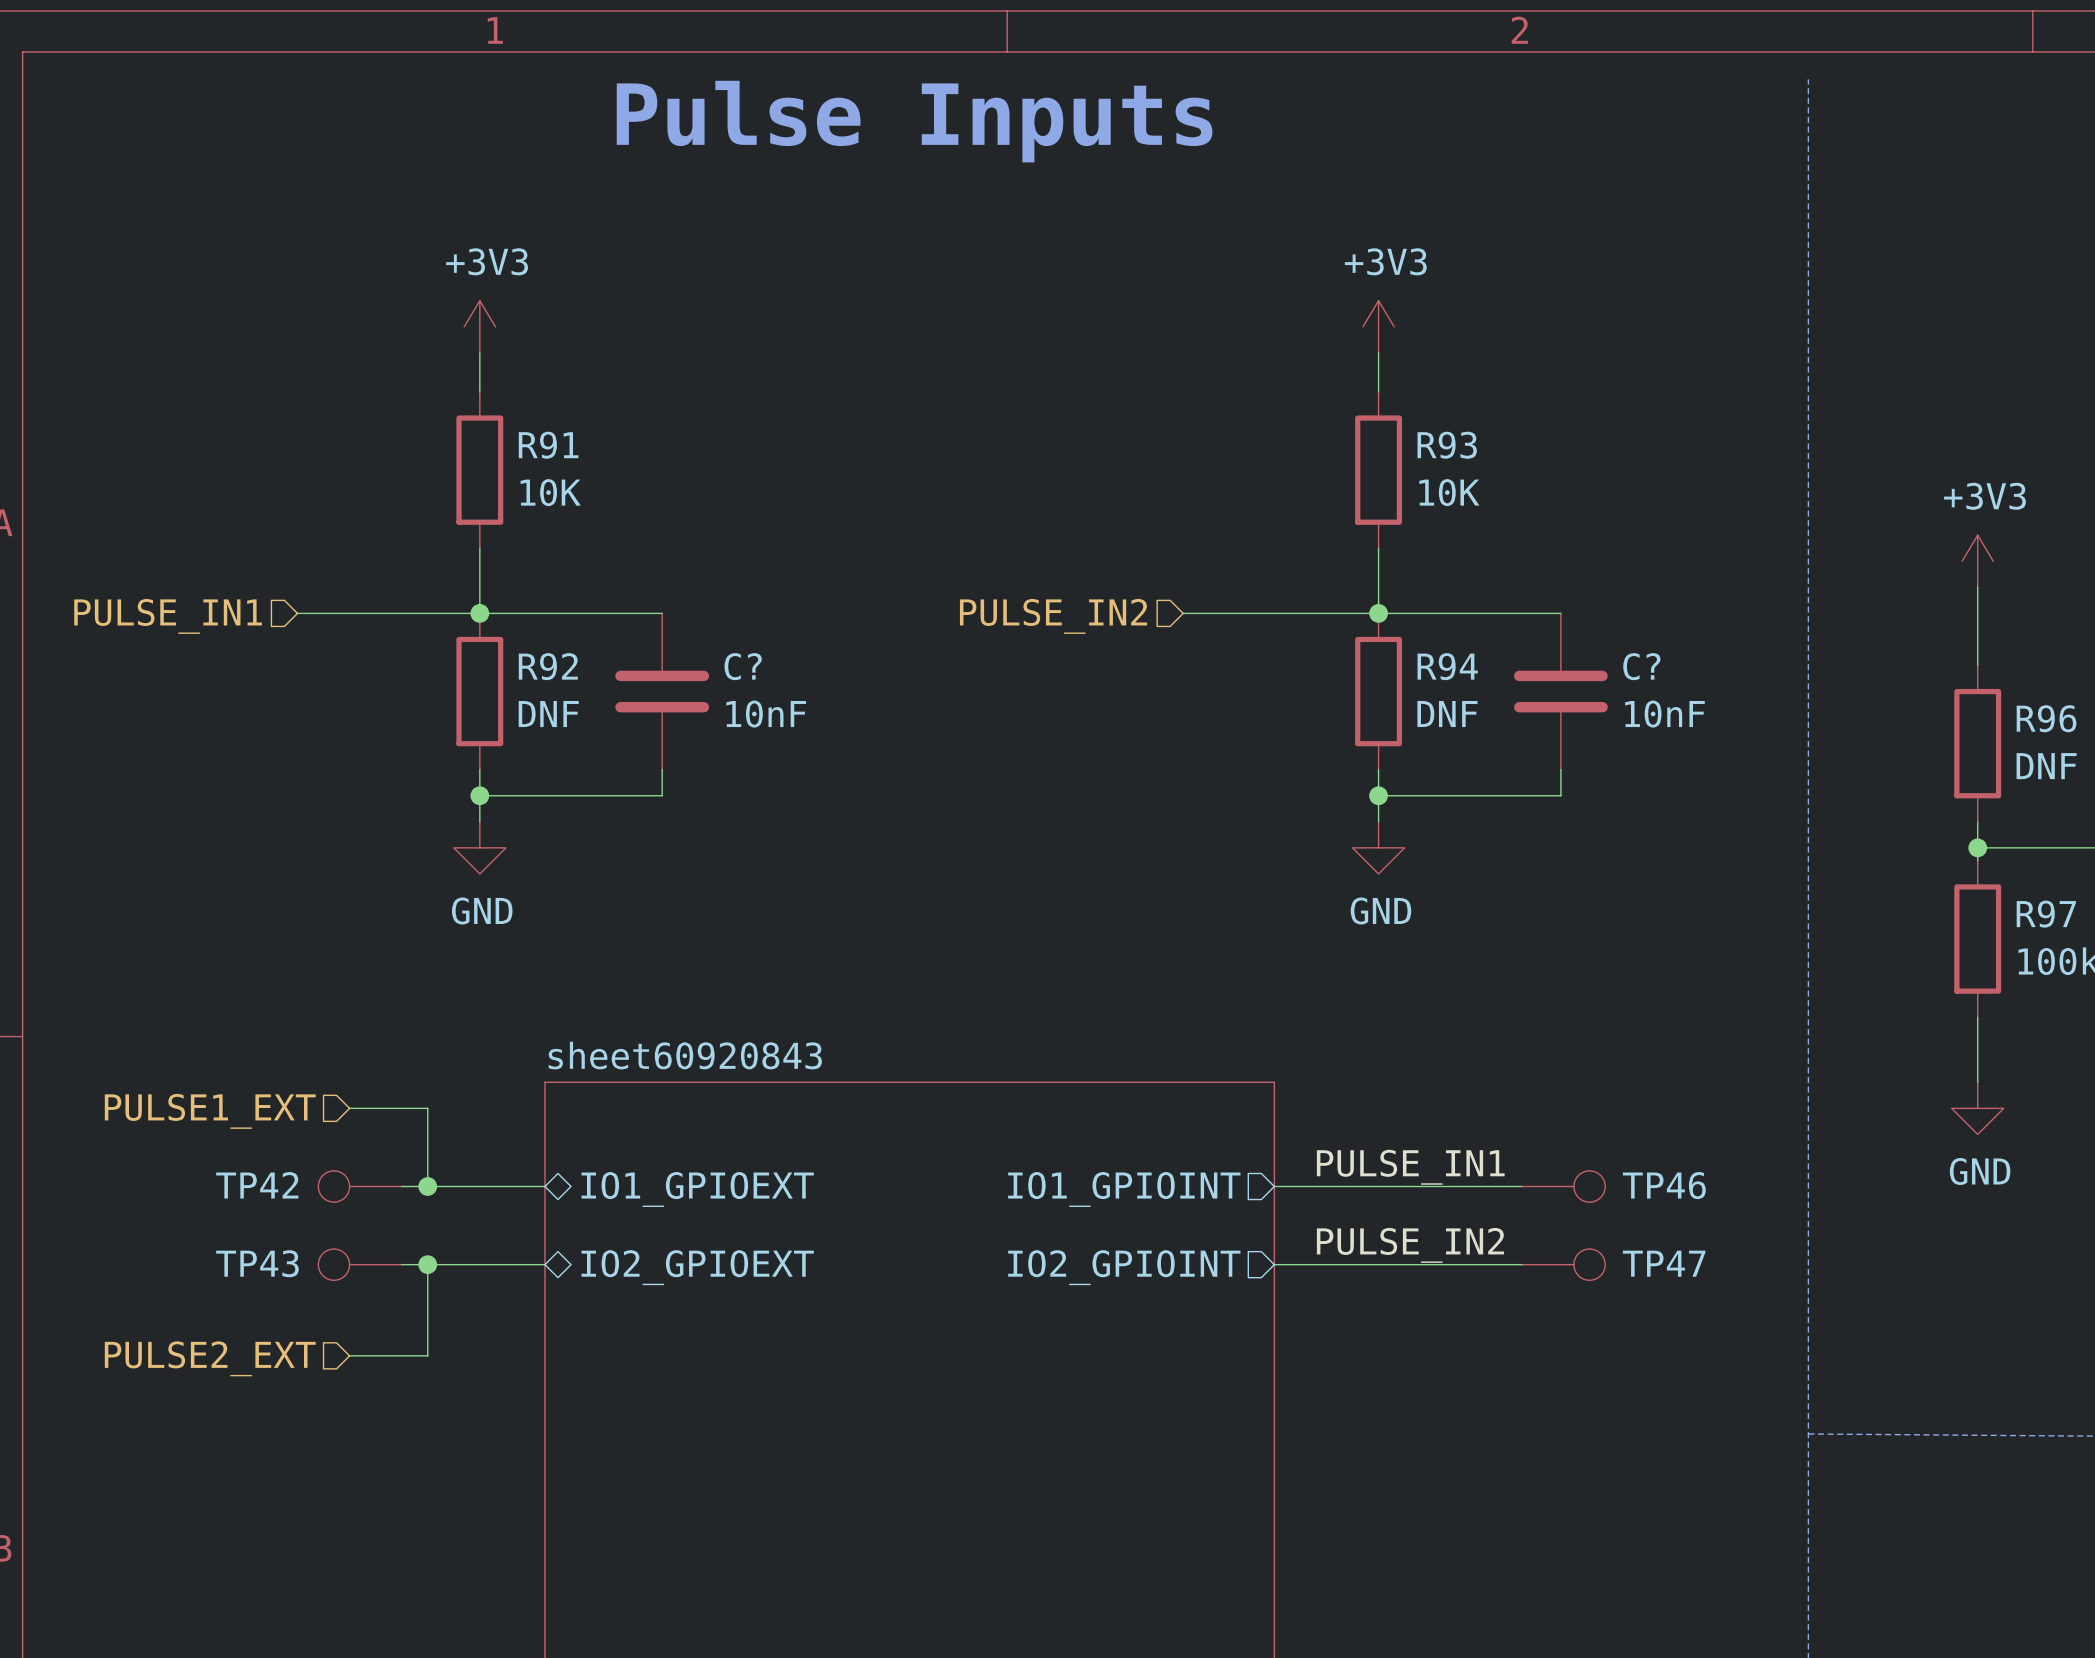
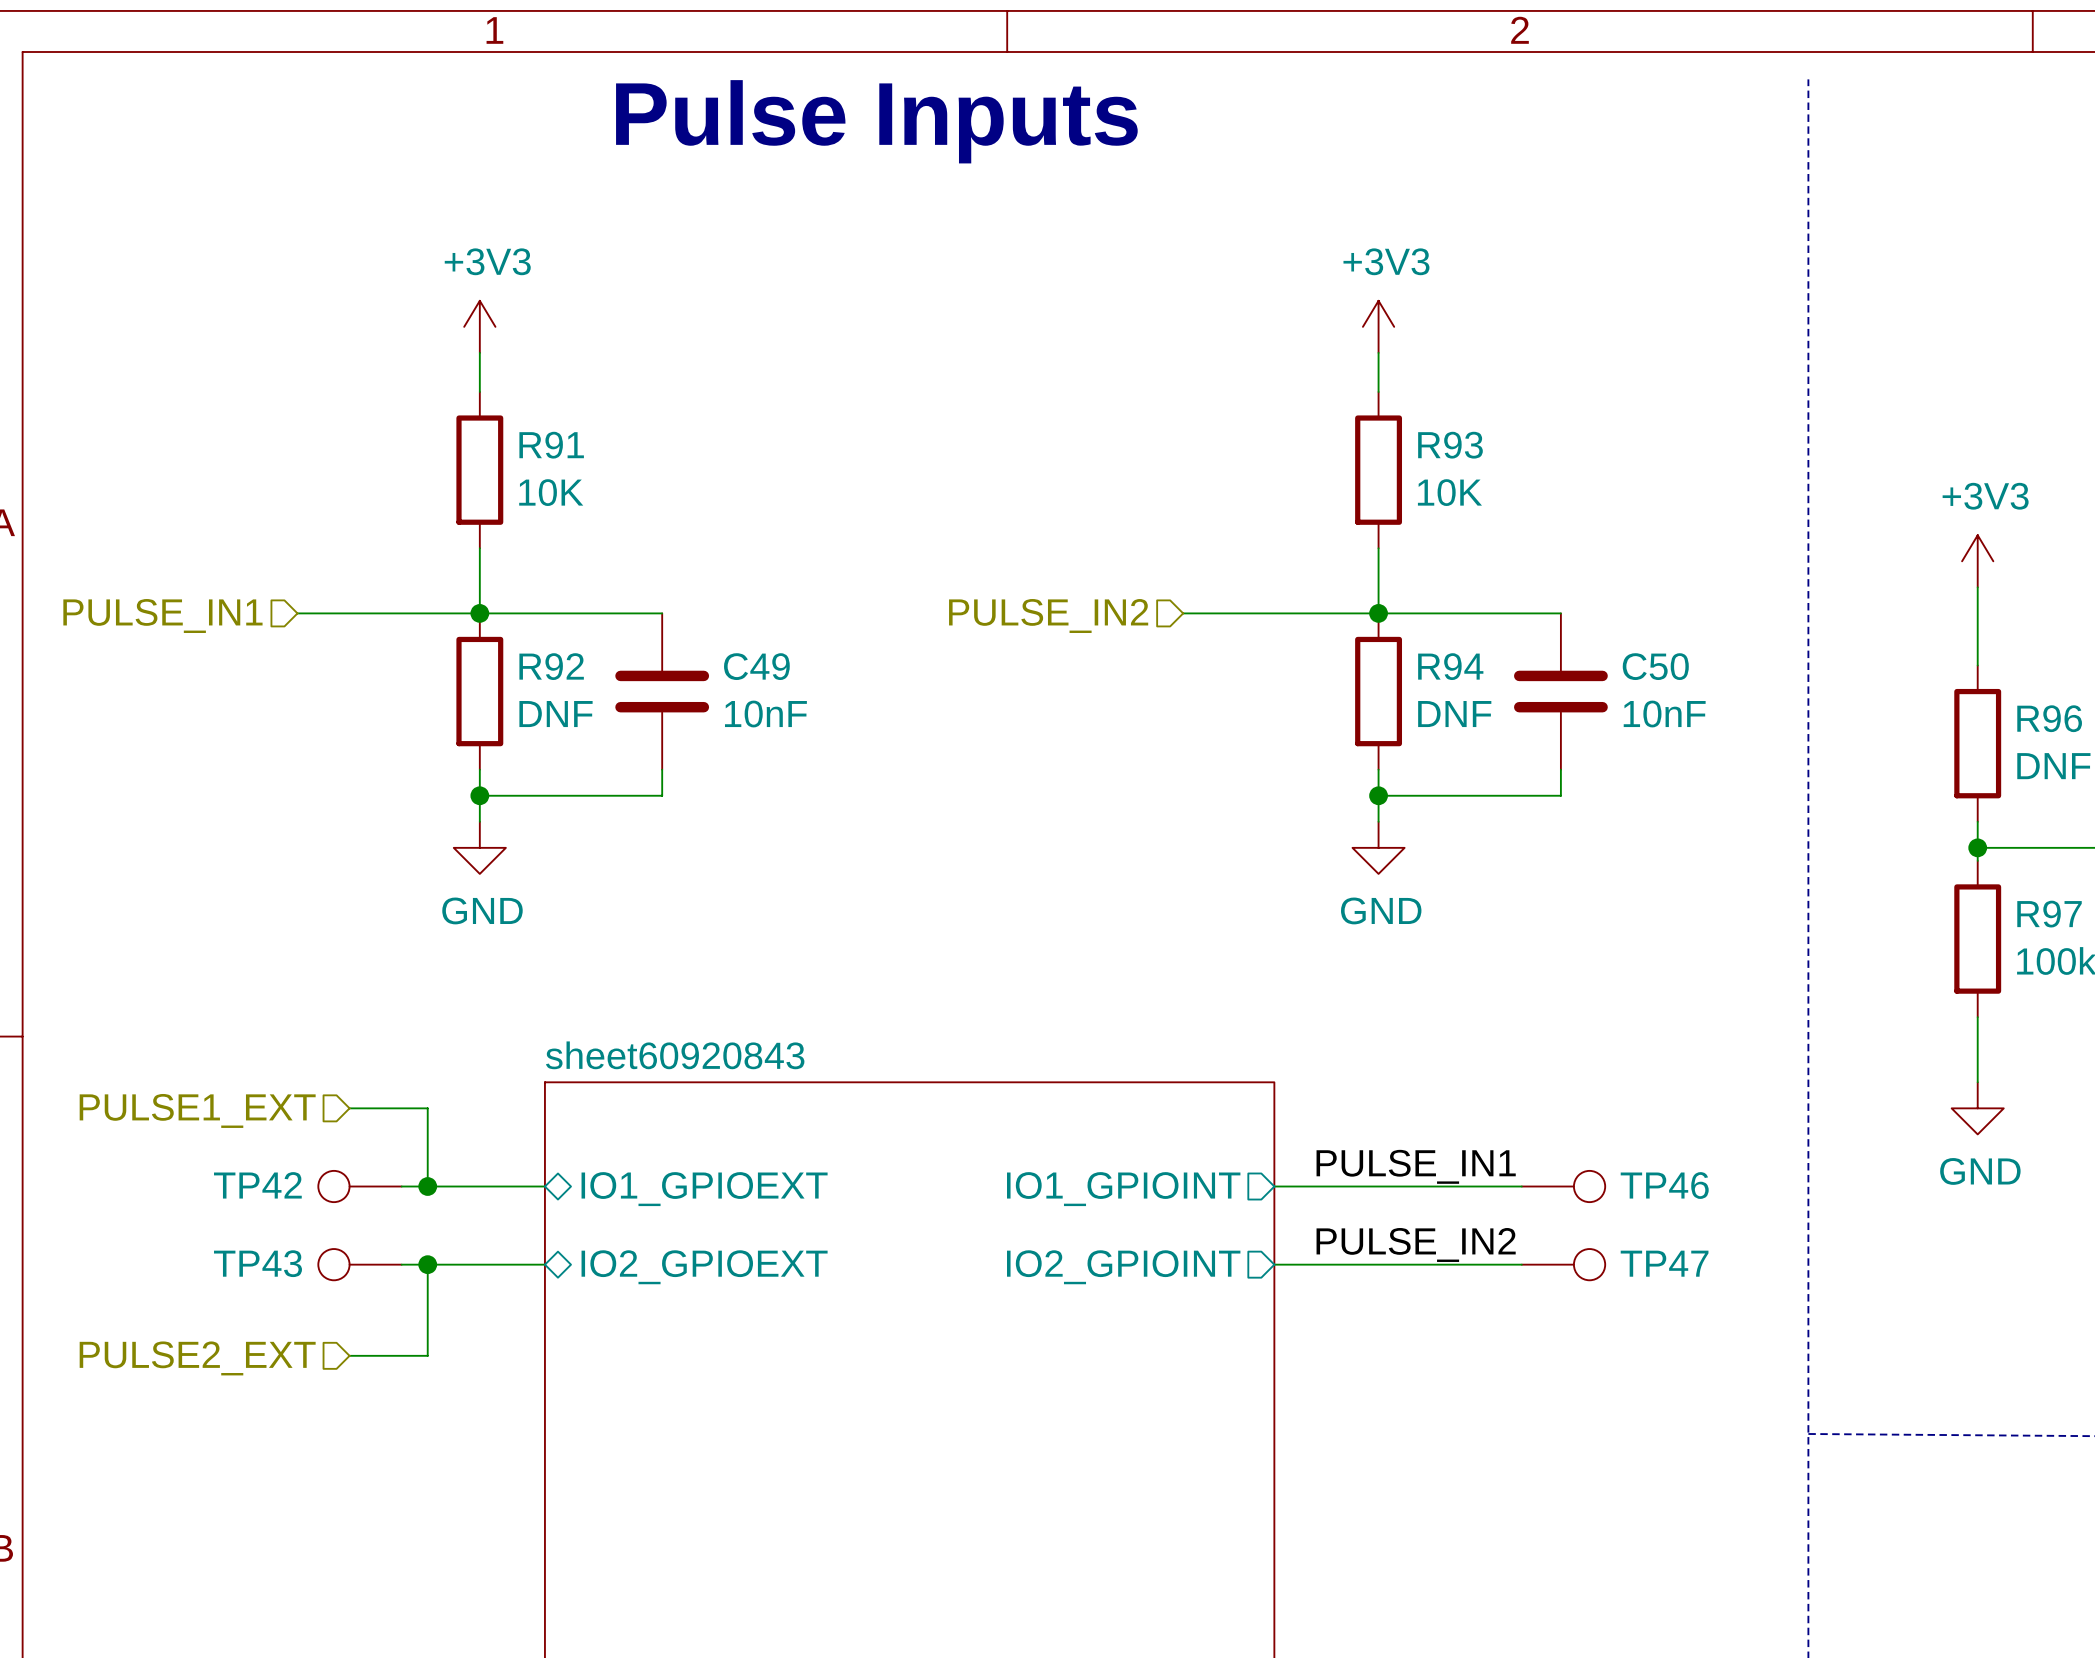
C? name: C? (743, 666) -> C49 (756, 666)
C? name: C? (1641, 666) -> C50 (1655, 666)

